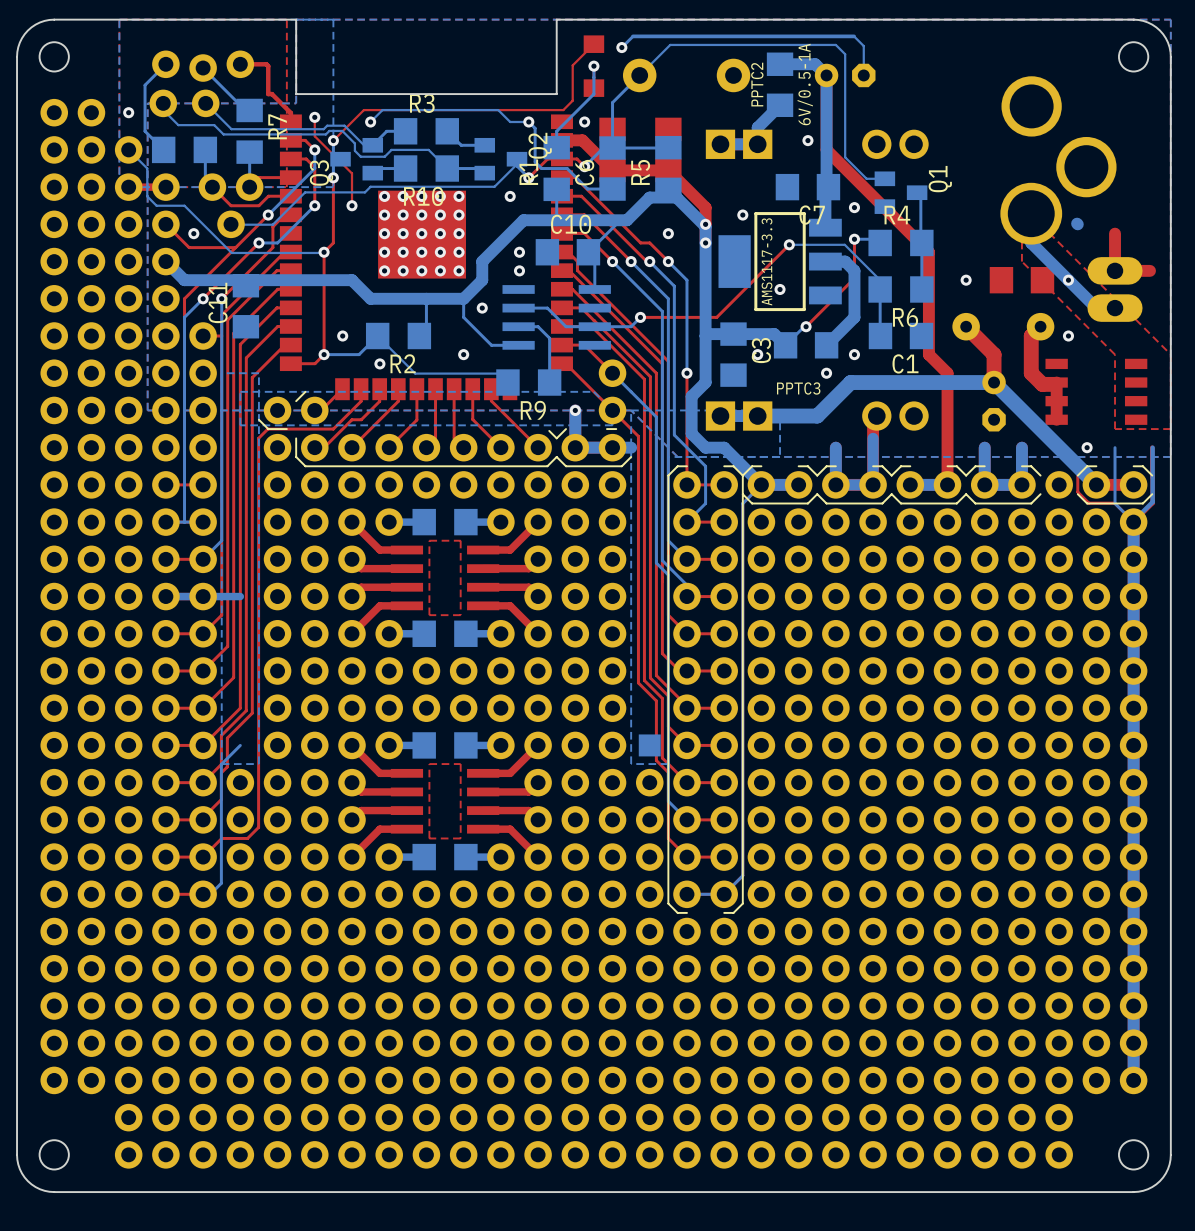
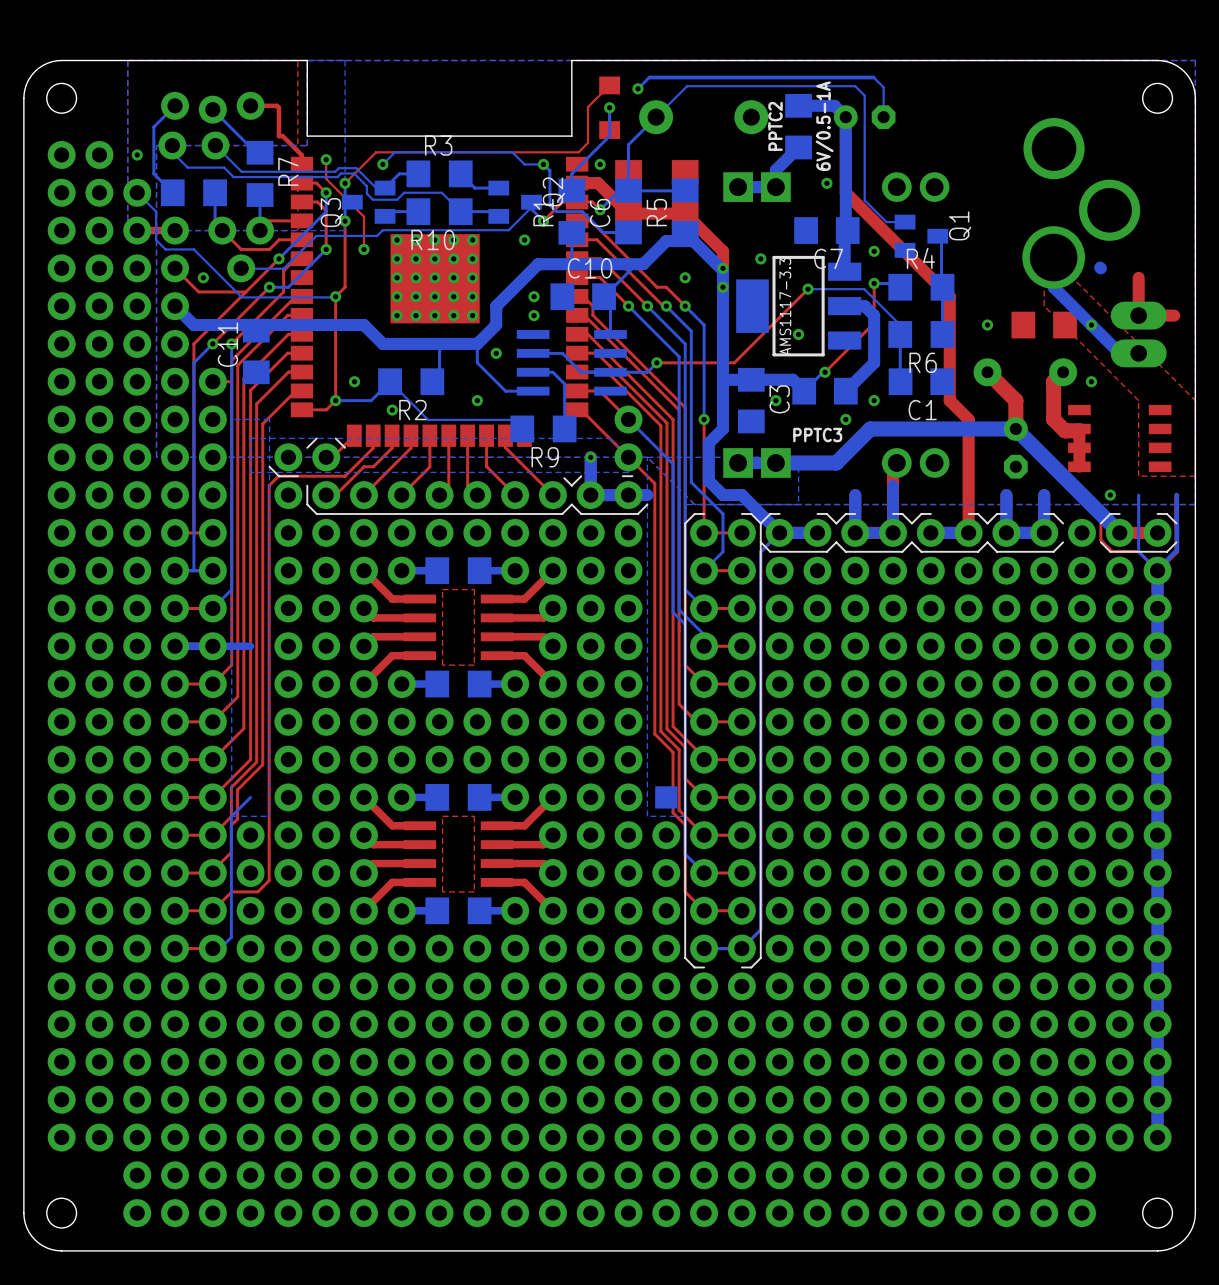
line: none -> (335, 438) (345, 447)

